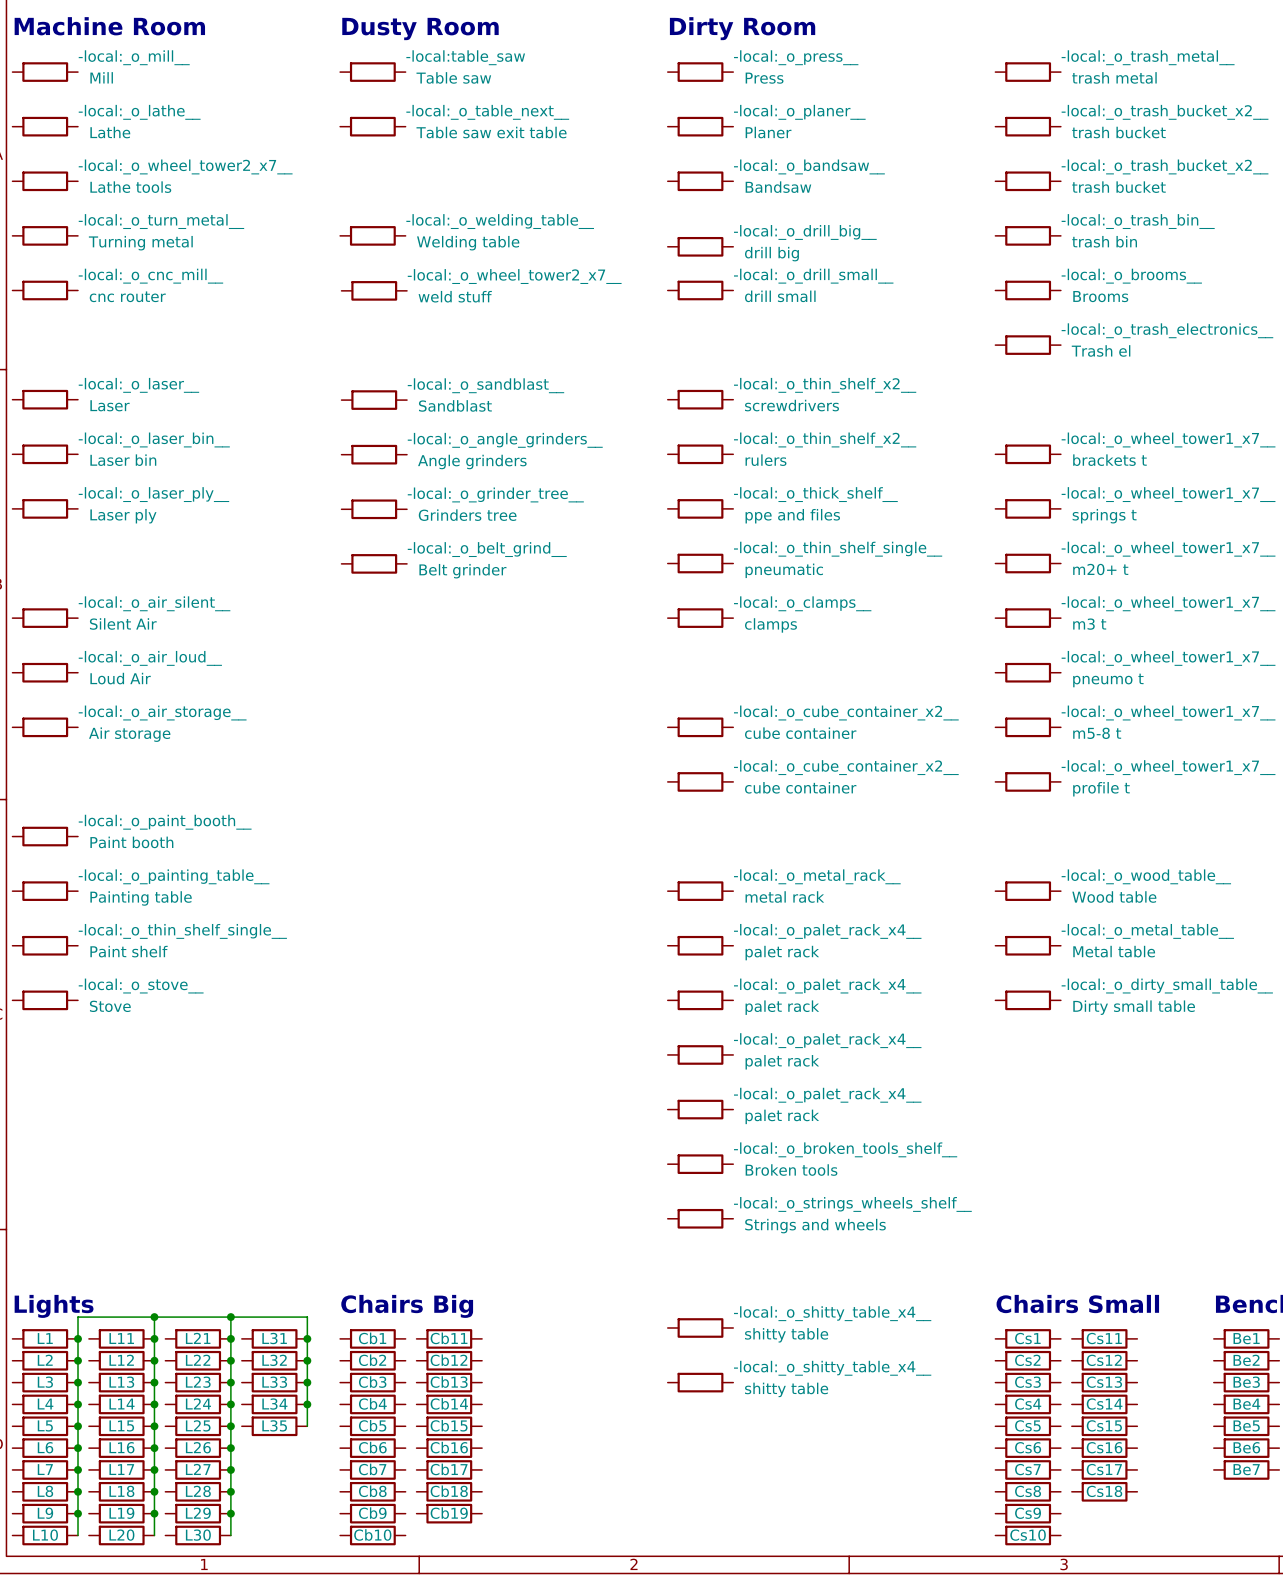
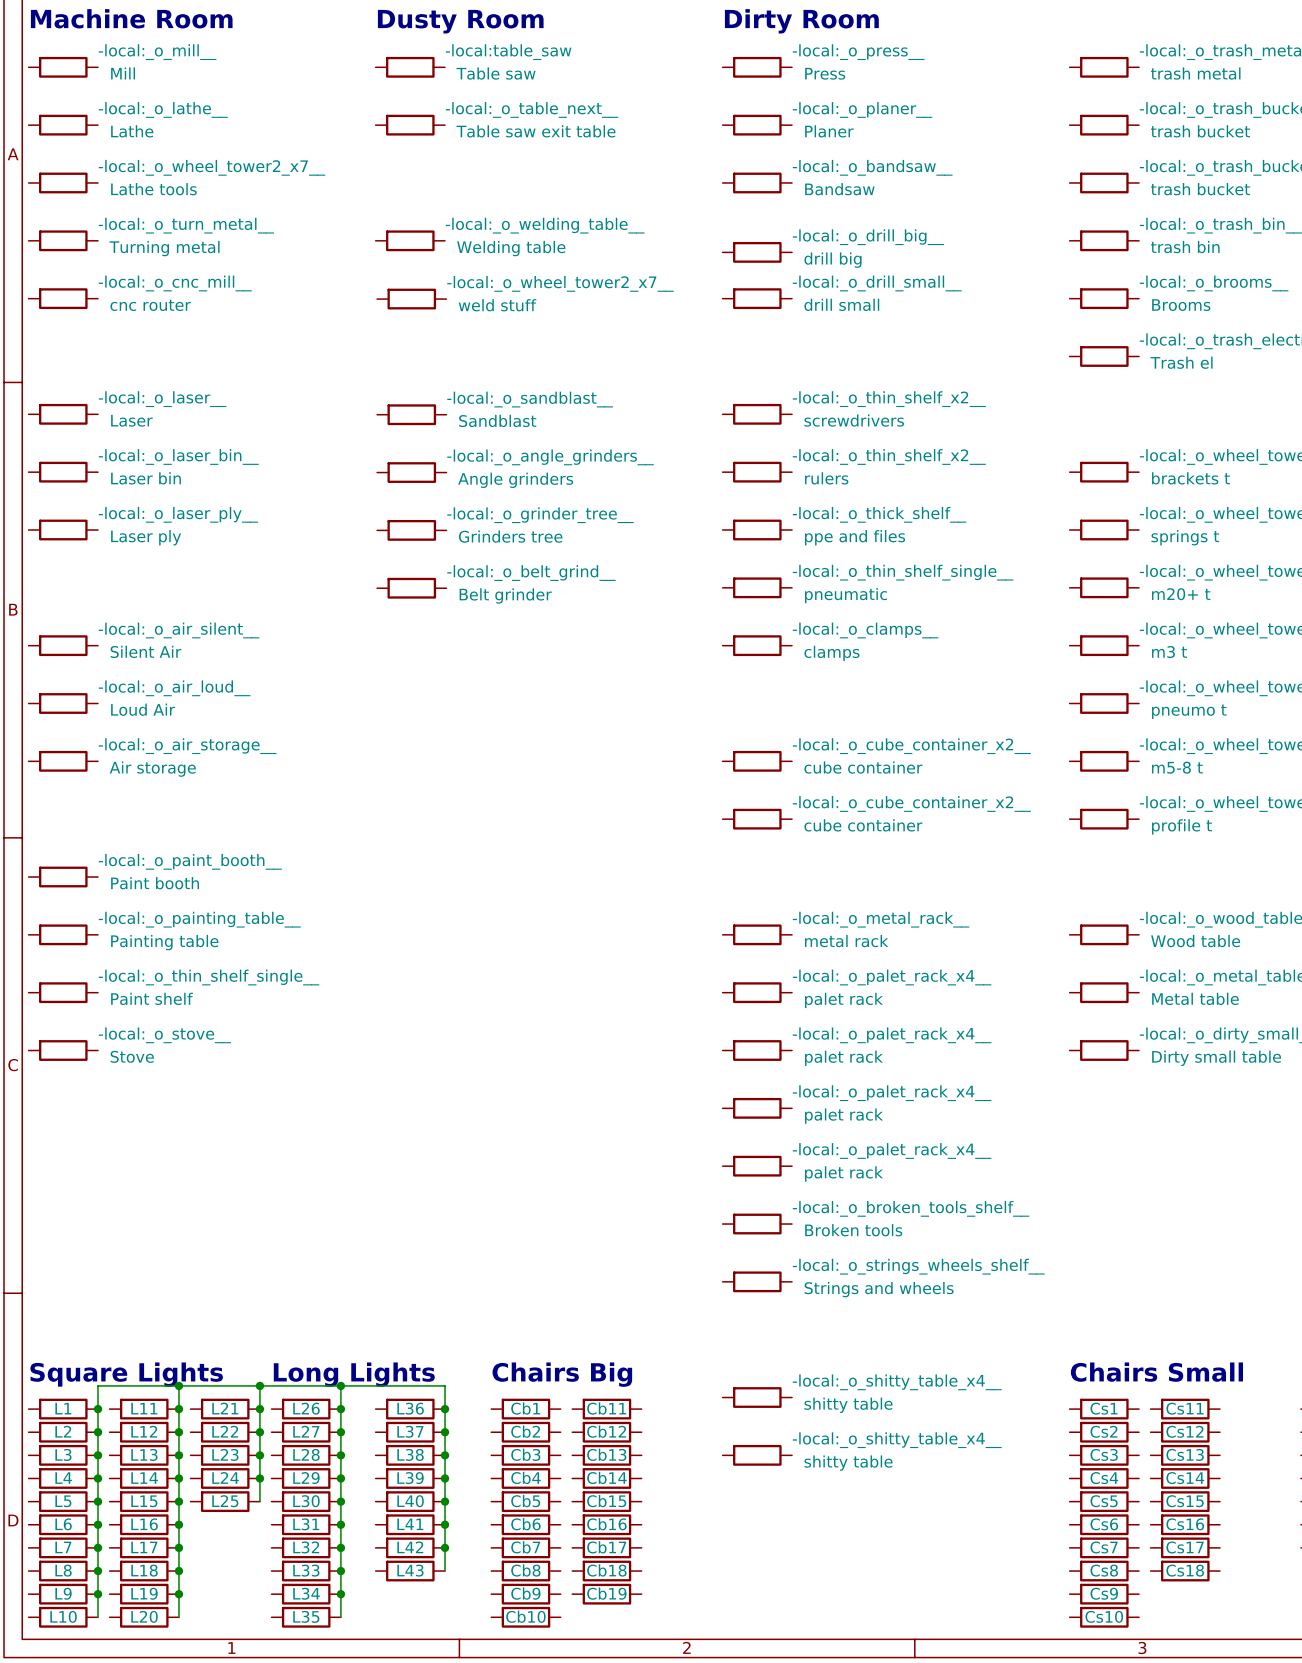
text: Lights (54, 1306) -> Square Lights (126, 1374)
text: none -> Long Lights (354, 1374)
text position: Chairs Big (407, 1306) -> Chairs Big (562, 1374)
wire: none -> (340, 1385) (445, 1385) (445, 1571)
junction: none -> (340, 1385)
L31 name: L31 (274, 1338) -> L26 (306, 1408)
Cb1 name: Cb1 (372, 1338) -> L36 (410, 1408)
junction: none -> (445, 1409)
Cb11 position: (449, 1338) -> (606, 1409)
Cb1: none -> (525, 1409)
L32 name: L32 (274, 1360) -> L27 (306, 1431)
Cb2 name: Cb2 (372, 1360) -> L37 (410, 1431)
junction: none -> (445, 1432)
Cb12 position: (449, 1360) -> (606, 1432)
Cb2: none -> (525, 1432)
L33 name: L33 (274, 1382) -> L28 (306, 1454)
Cb3 name: Cb3 (372, 1382) -> L38 (410, 1454)
junction: none -> (445, 1455)
Cb13 position: (449, 1382) -> (606, 1455)
Cb3: none -> (525, 1455)
Cb4 name: Cb4 (372, 1403) -> L39 (410, 1478)
L34 name: L34 (274, 1404) -> L29 (306, 1478)
junction: none -> (445, 1478)
Cb14 position: (449, 1404) -> (606, 1478)
Cb4: none -> (525, 1478)
L35 name: L35 (274, 1425) -> L30 (306, 1501)
Cb5 name: Cb5 (372, 1425) -> L40 (410, 1501)
wire: (230, 1426) (230, 1535) -> (340, 1501) (340, 1617)
junction: (230, 1426) -> none
junction: none -> (340, 1501)
junction: none -> (445, 1501)
Cb15 position: (449, 1426) -> (606, 1501)
Cb5: none -> (525, 1501)
Cb6 name: Cb6 (372, 1447) -> L41 (410, 1524)
L26: (198, 1448) -> none
junction: (230, 1448) -> none
L31: none -> (306, 1524)
junction: none -> (340, 1524)
junction: none -> (445, 1524)
Cb16 position: (449, 1448) -> (606, 1524)
Cb6: none -> (525, 1524)
L27: (198, 1469) -> none
junction: (230, 1469) -> none
L32: none -> (306, 1547)
junction: none -> (340, 1547)
Cb7 name: Cb7 (372, 1469) -> L42 (410, 1547)
junction: none -> (445, 1547)
Cb17 position: (449, 1469) -> (606, 1547)
Cb7: none -> (525, 1547)
L28: (198, 1491) -> none
junction: (230, 1491) -> none
L33: none -> (306, 1571)
junction: none -> (340, 1571)
Cb8 name: Cb8 (372, 1491) -> L43 (410, 1570)
Cb18 position: (449, 1491) -> (606, 1571)
Cb8: none -> (525, 1571)
L29: (198, 1513) -> none
junction: (230, 1513) -> none
L34: none -> (306, 1594)
junction: none -> (340, 1594)
Cb9 position: (372, 1513) -> (525, 1594)
Cb19 position: (449, 1513) -> (606, 1594)
L30: (198, 1535) -> none
L35: none -> (306, 1617)
Cb10 position: (372, 1535) -> (525, 1617)

